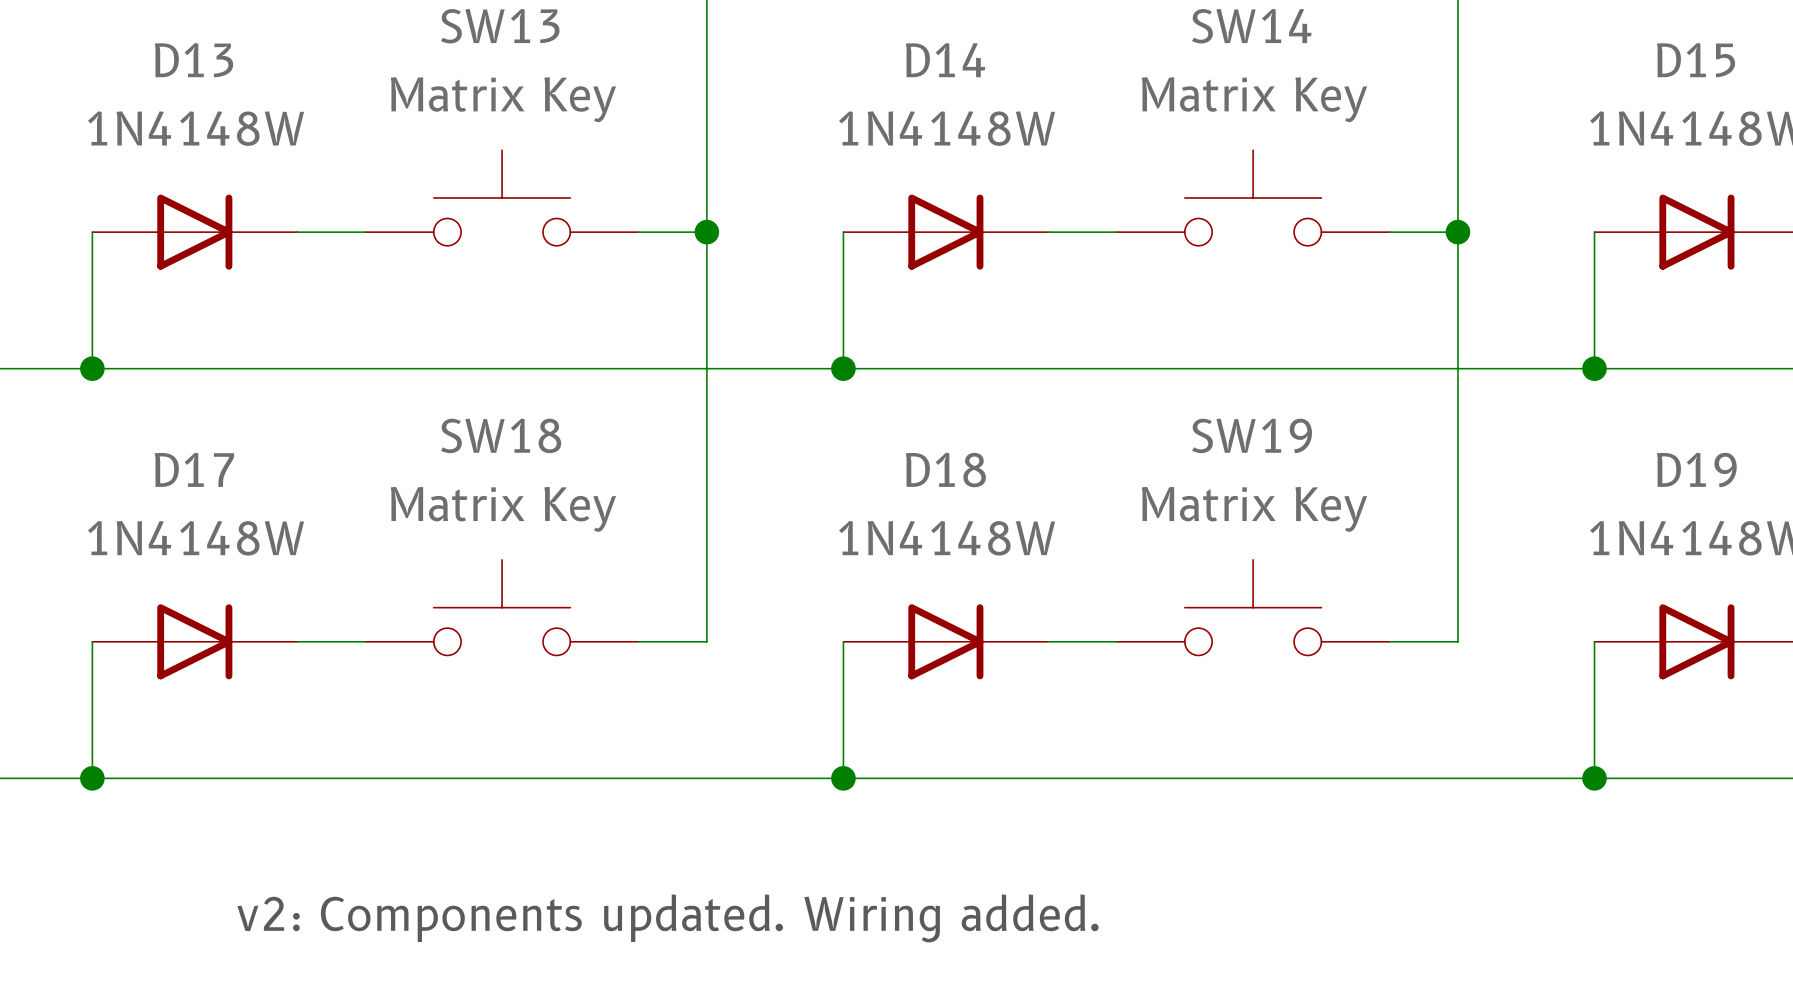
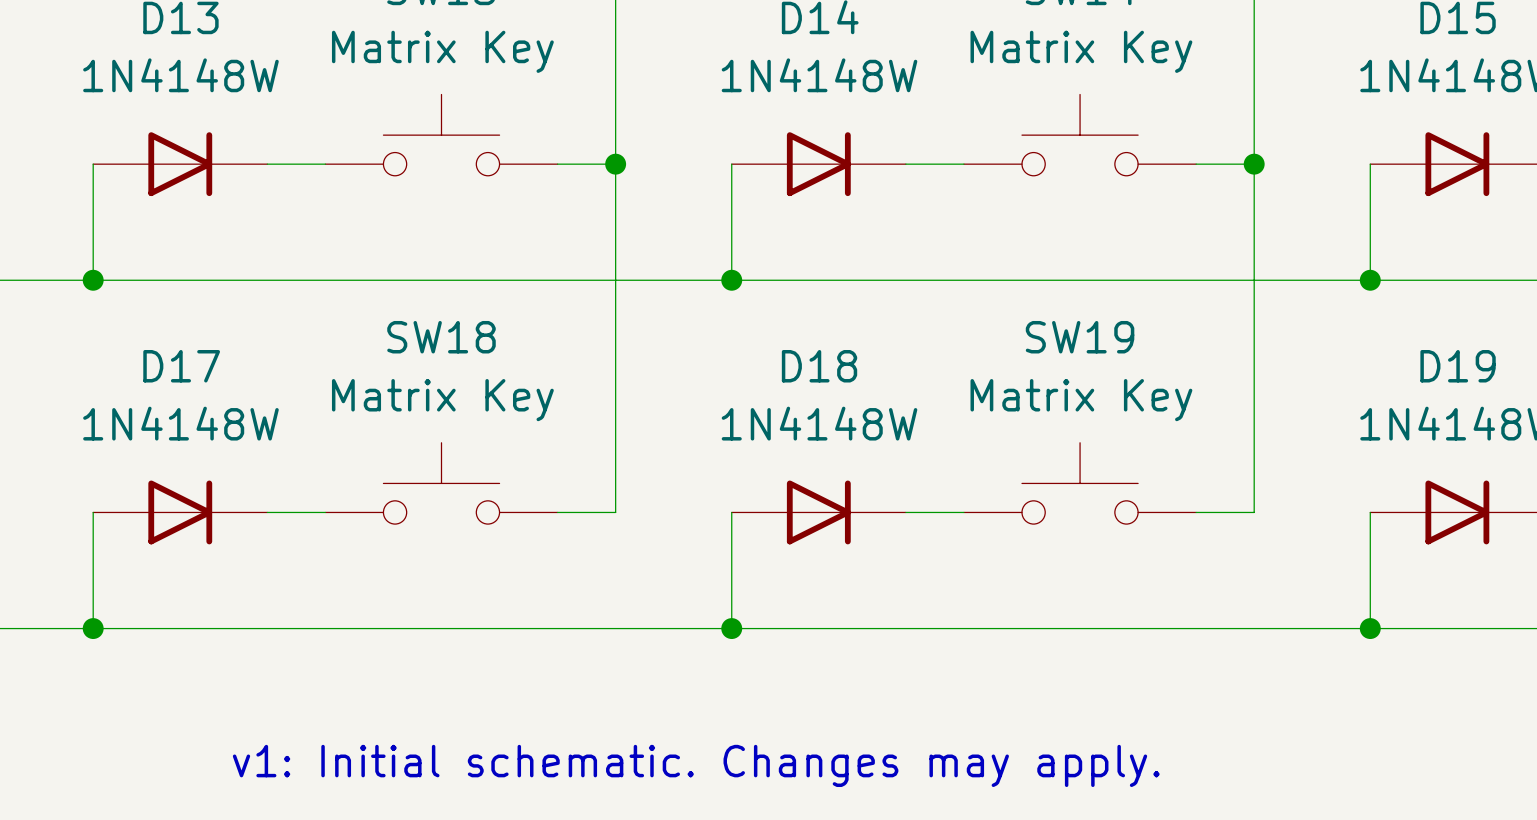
text: v2: Components updated. Wiring added. (667, 918) -> none
text: none -> v1: Initial schematic. Changes may apply. (696, 765)

